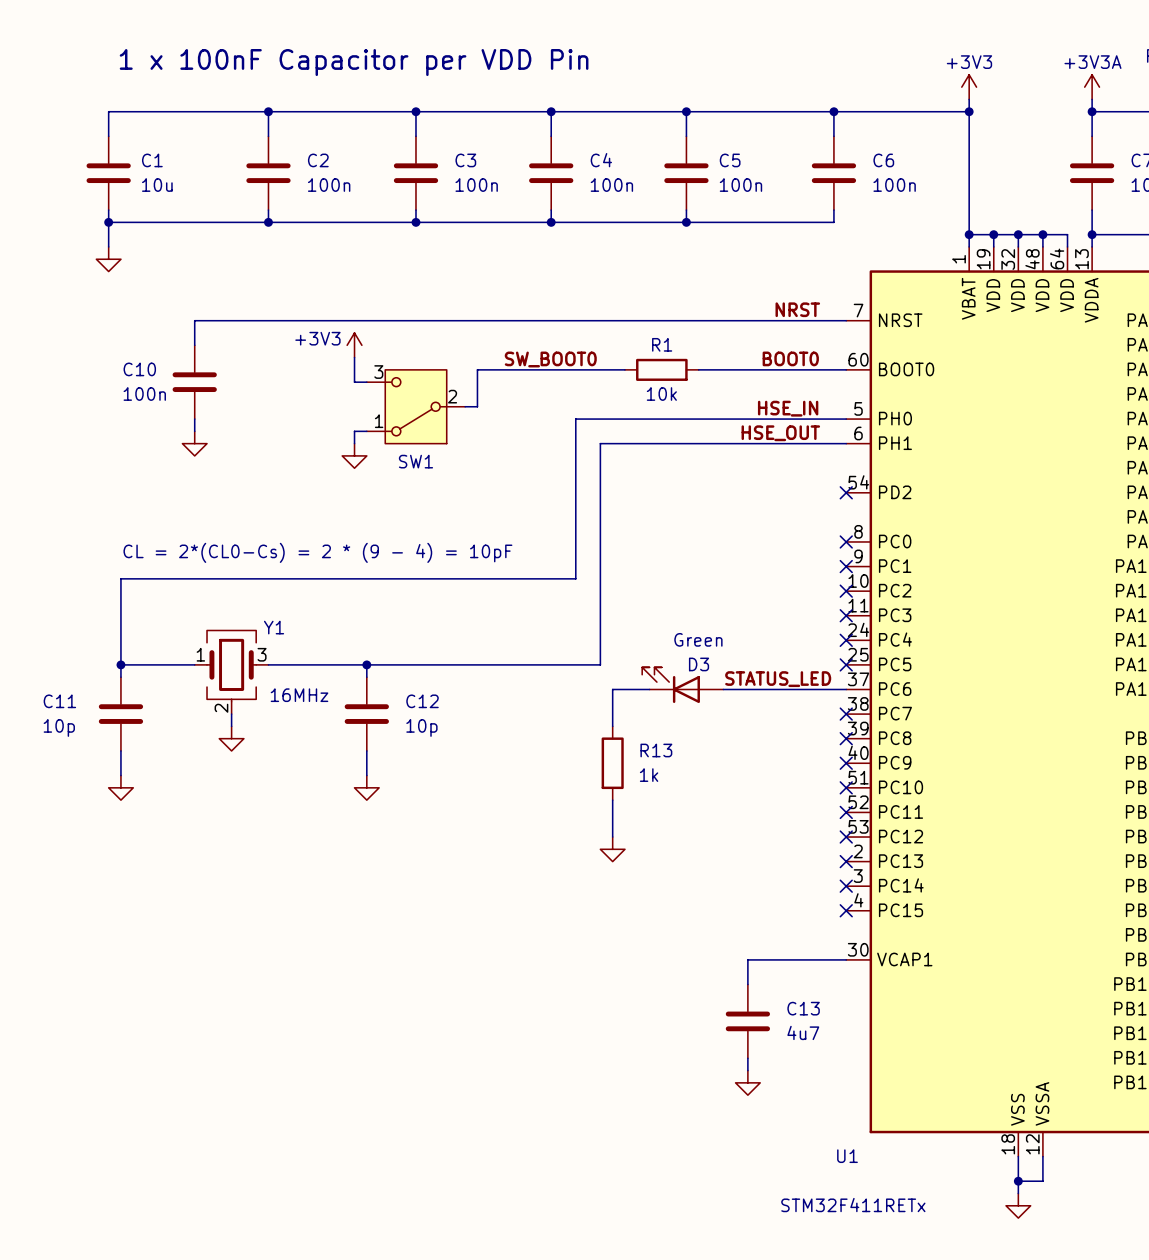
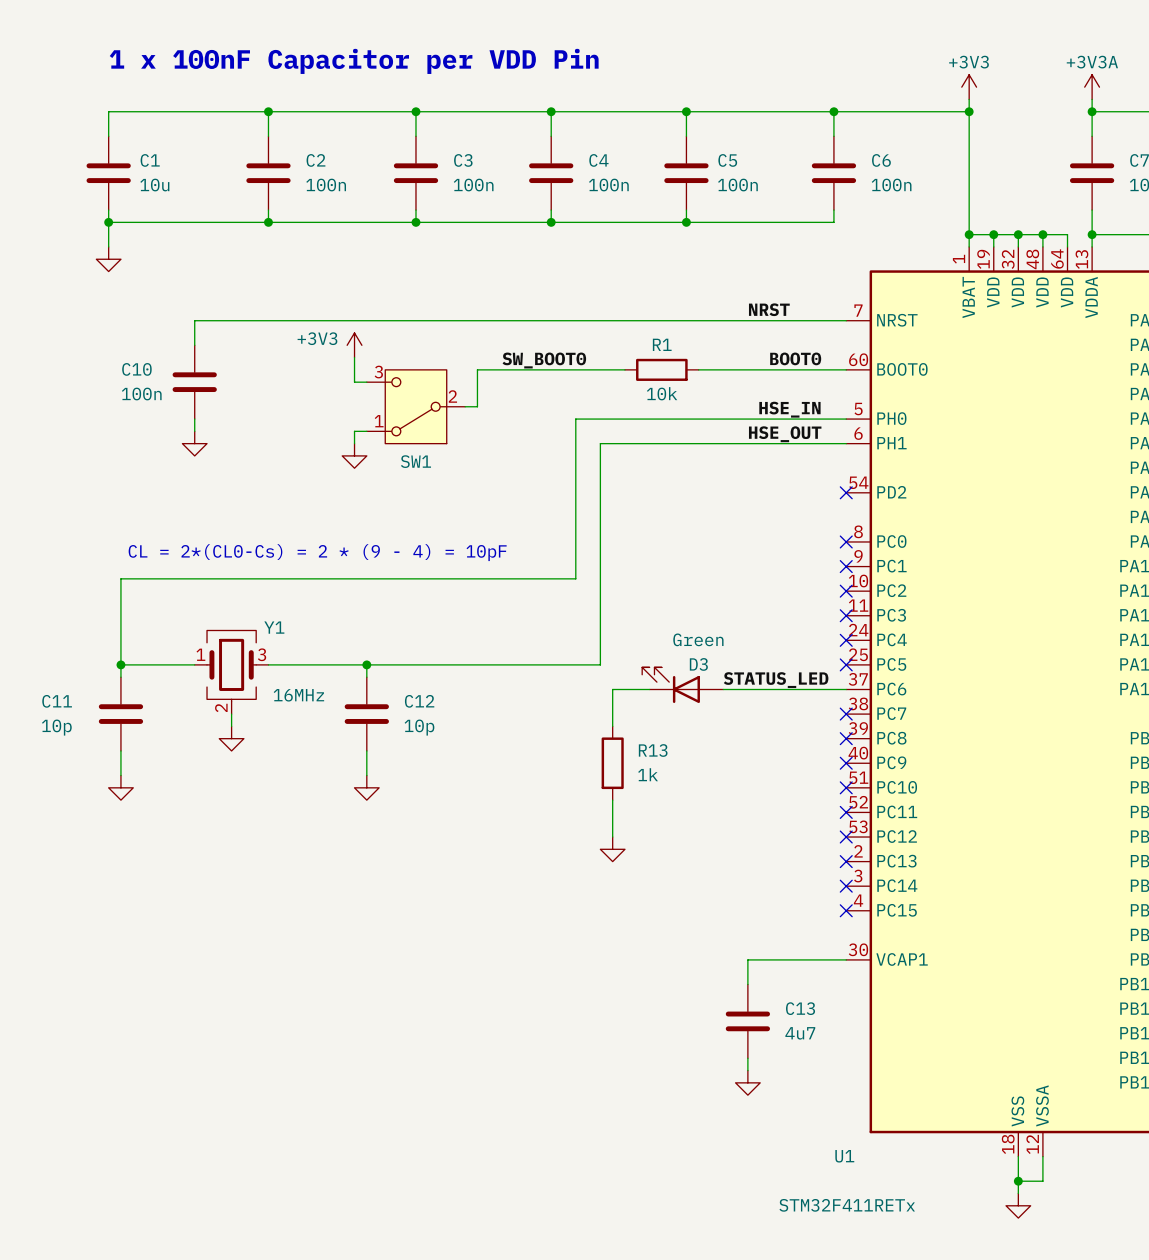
label position: NRST (797, 309) -> NRST (769, 309)
label position: HSE_OUT (780, 433) -> HSE_OUT (785, 434)
label position: STATUS_LED (778, 679) -> STATUS_LED (776, 680)

